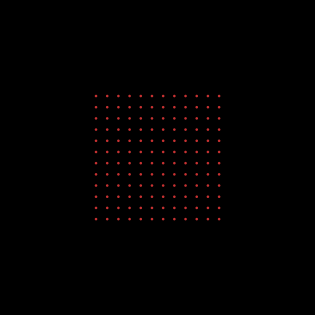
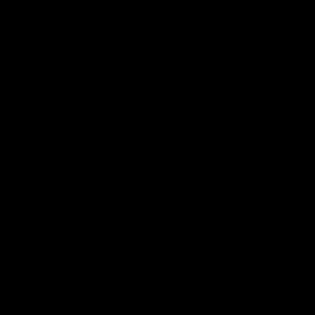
part: (157, 157) -> none

